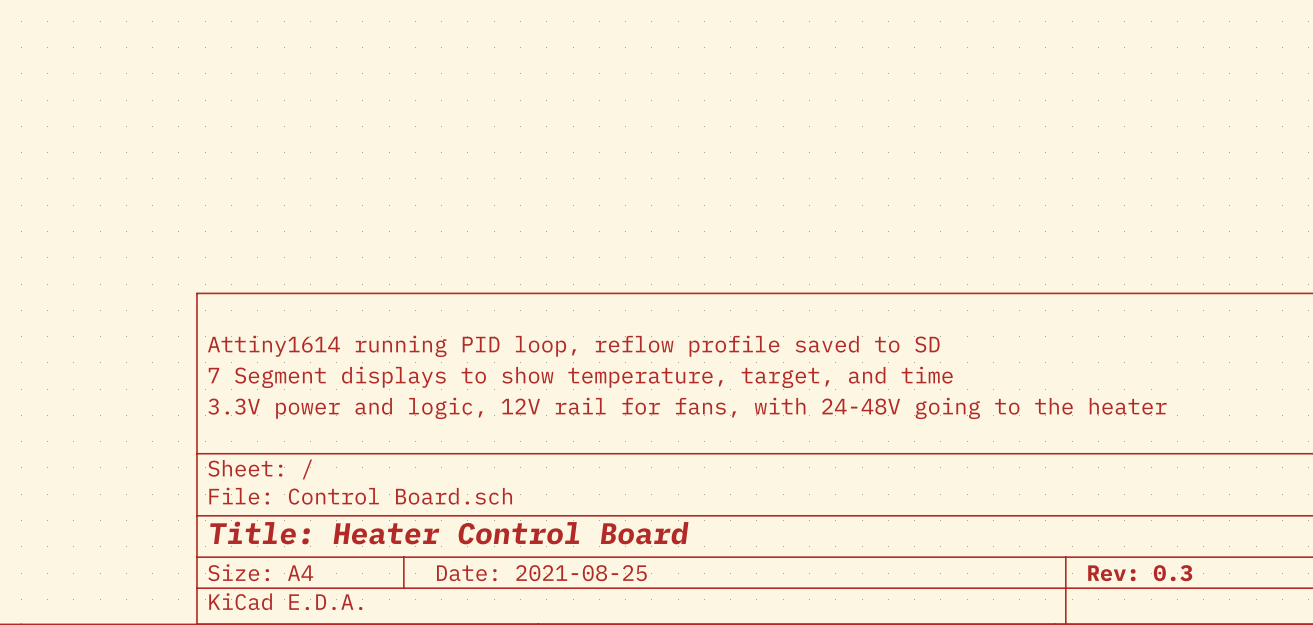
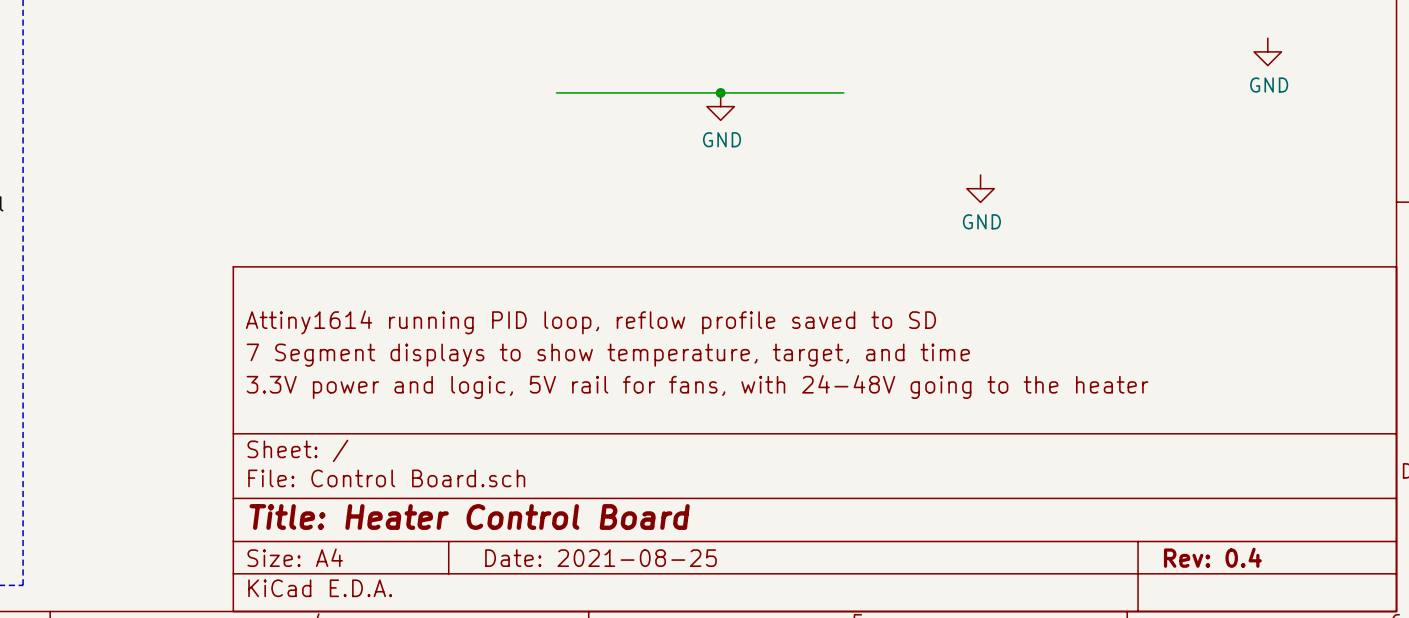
power symbol: none -> GND (1267, 51)
wire: none -> (556, 92) (843, 92)
junction: none -> (720, 92)
power symbol: none -> GND (720, 106)
power symbol: none -> GND (980, 188)
title block: 3.3V power and logic, 12V rail for fans, with 24-48V going to the heater (687, 408) -> 3.3V power and logic, 5V rail for fans, with 24-48V going to the heater (697, 387)
title block: Rev: 0.3 (1140, 573) -> Rev: 0.4 (1212, 557)

